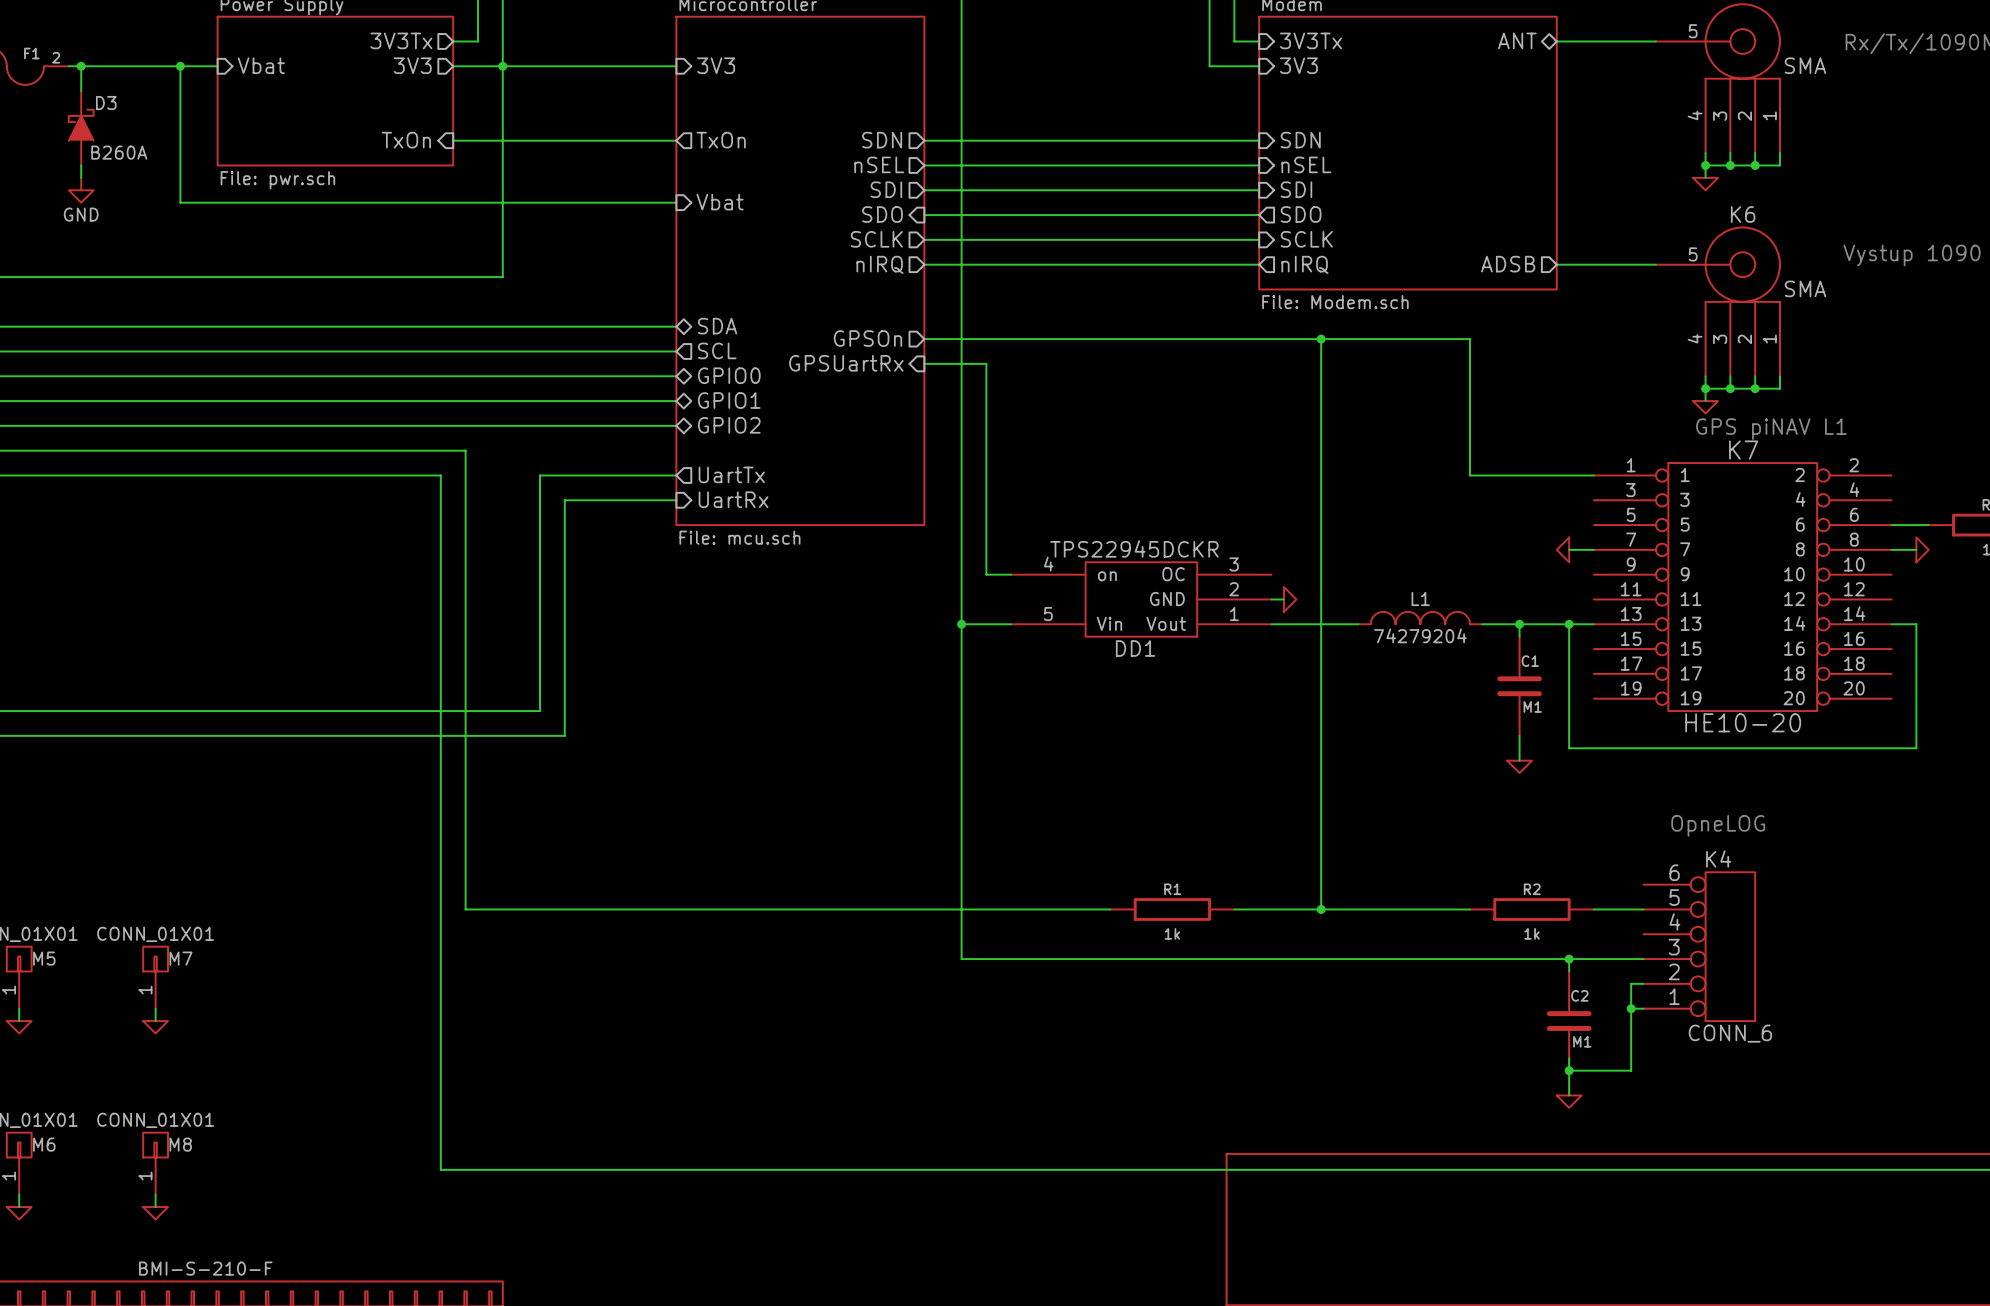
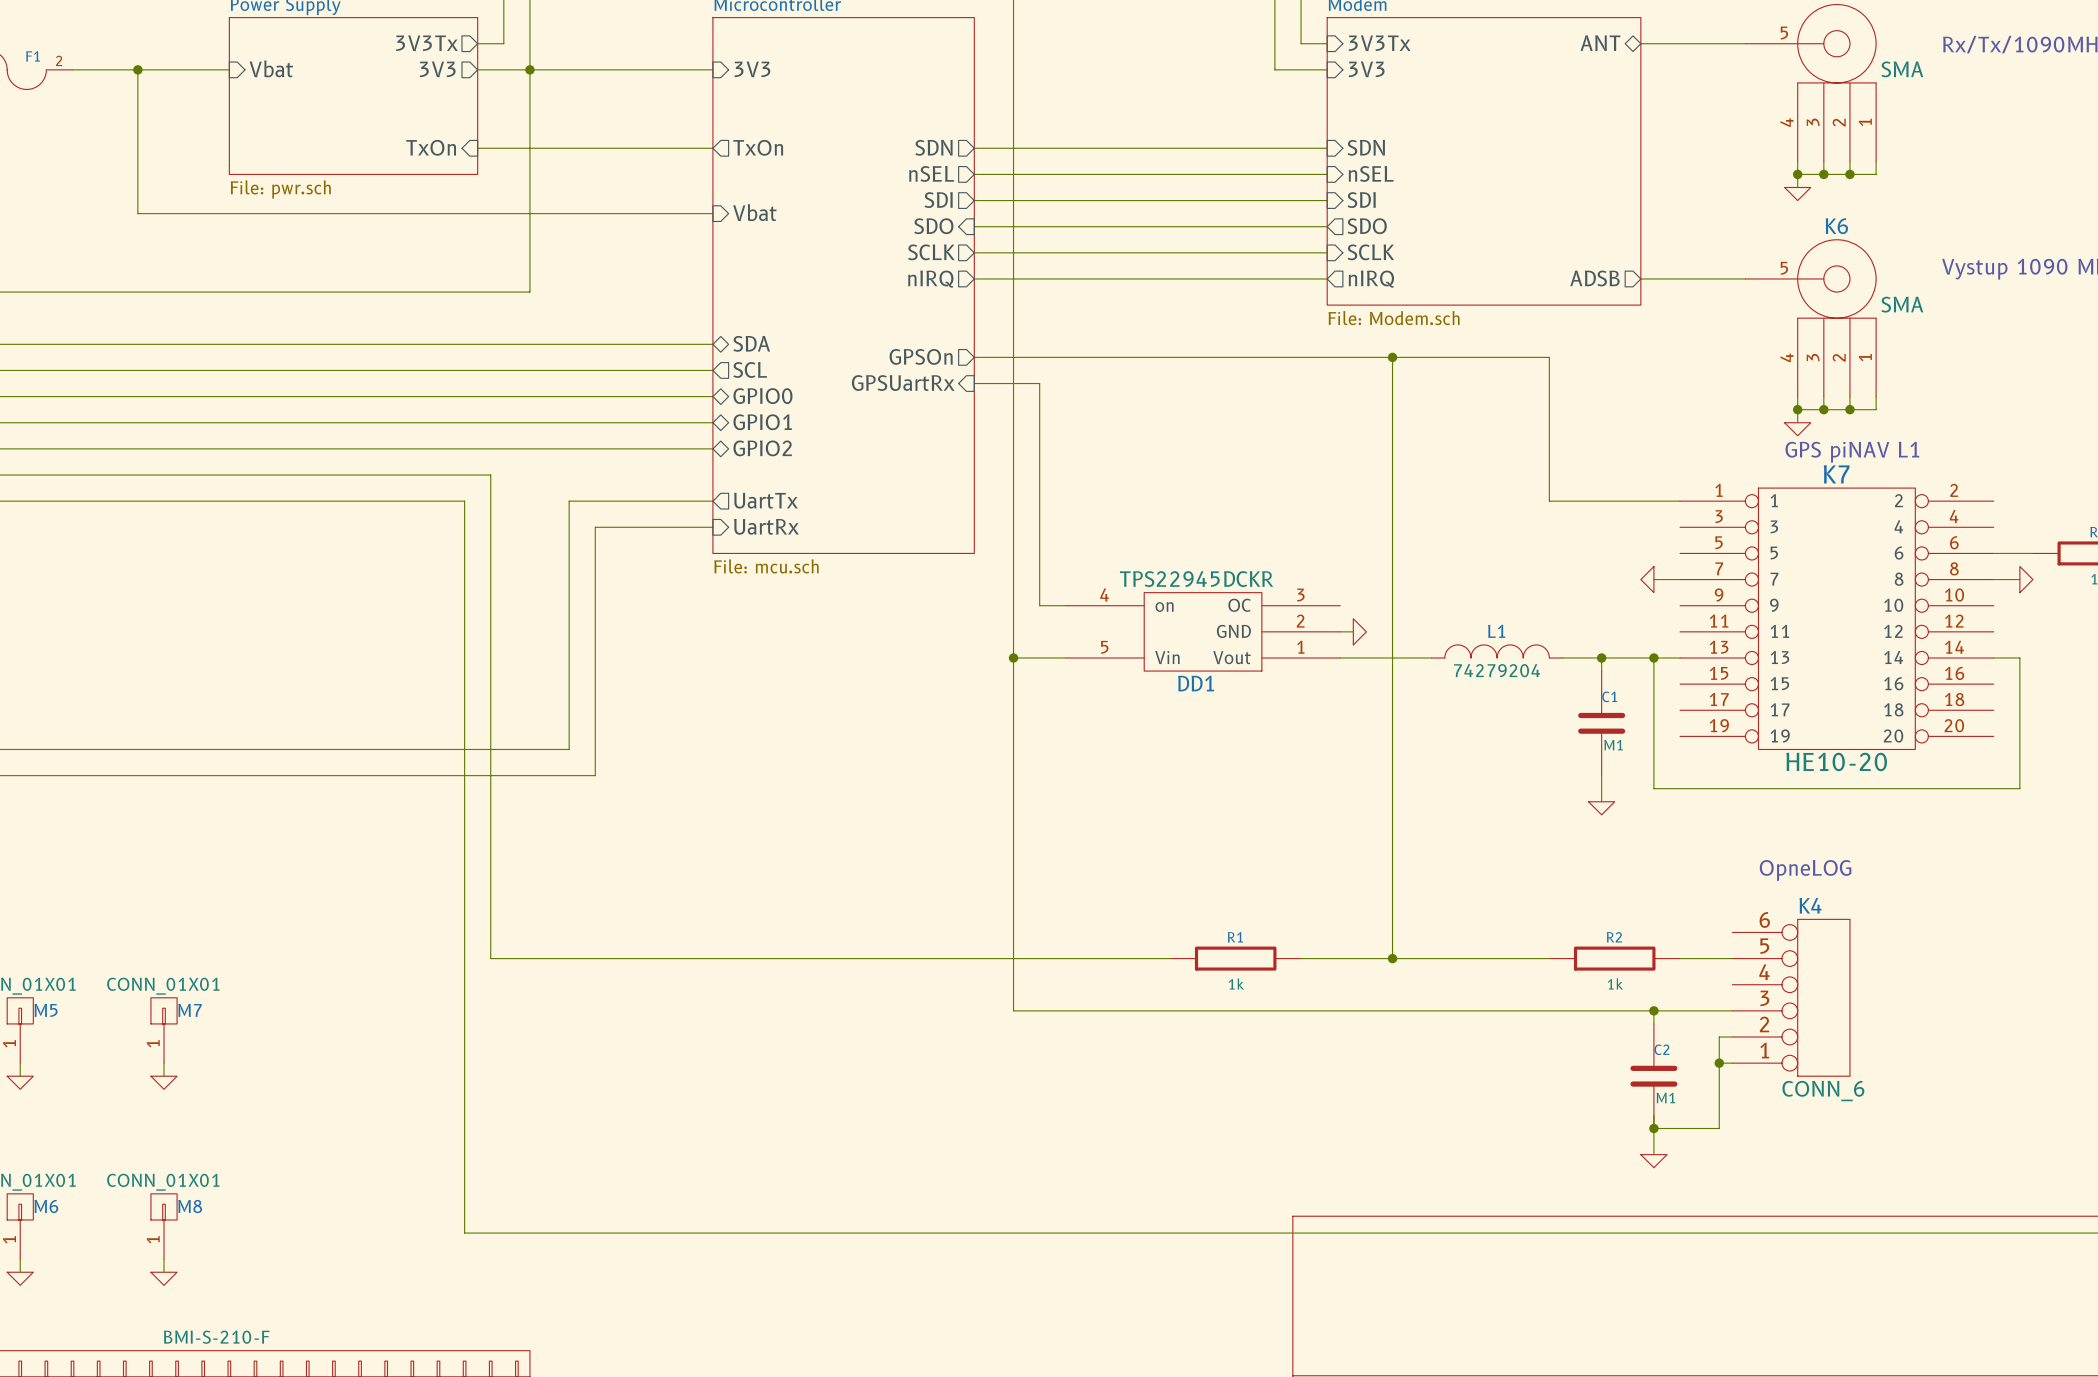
wire: (81, 66) (81, 91) -> none
junction: (81, 66) -> none
junction: none -> (137, 69)
wire: (180, 66) (180, 202) -> (137, 69) (137, 213) (190, 213)
junction: (180, 66) -> none
D3: B260A (81, 128) -> none
wire: (81, 165) (81, 177) -> none
power symbol: GND (81, 190) -> none

